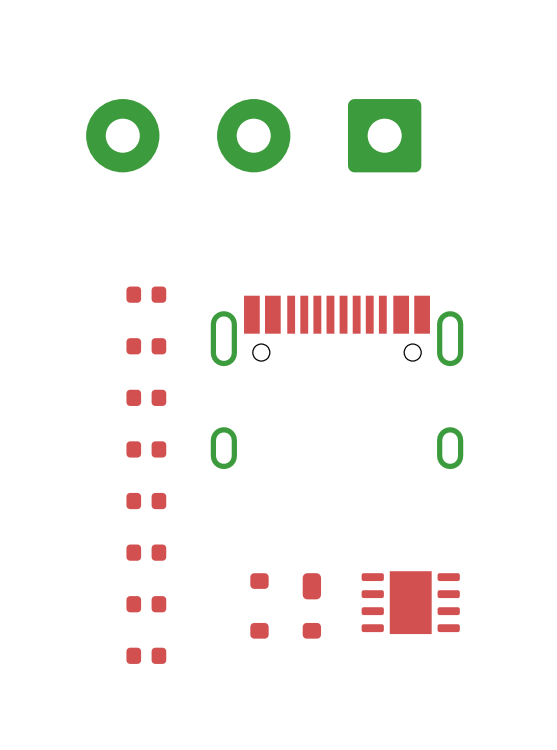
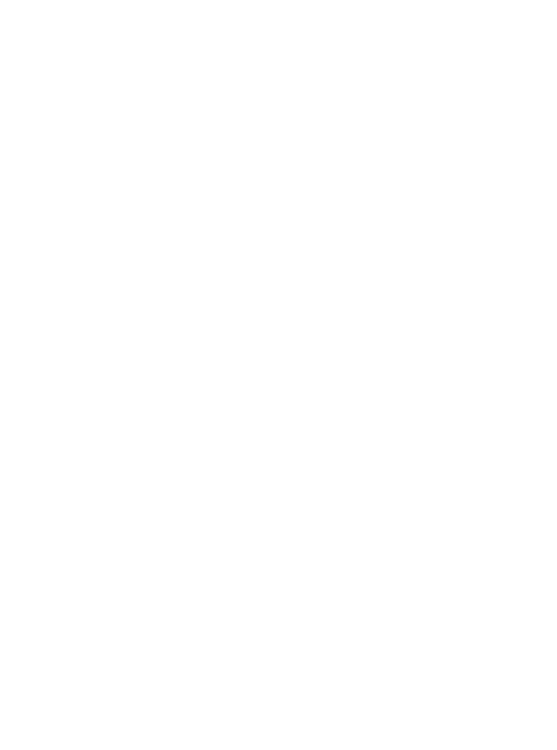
part: (253, 135) -> none
part: (146, 294) -> none
part: (146, 346) -> none
part: (337, 382) -> none
part: (146, 397) -> none
part: (146, 449) -> none
part: (146, 501) -> none
part: (146, 552) -> none
part: (410, 602) -> none
part: (146, 604) -> none
part: (285, 605) -> none
part: (146, 655) -> none

